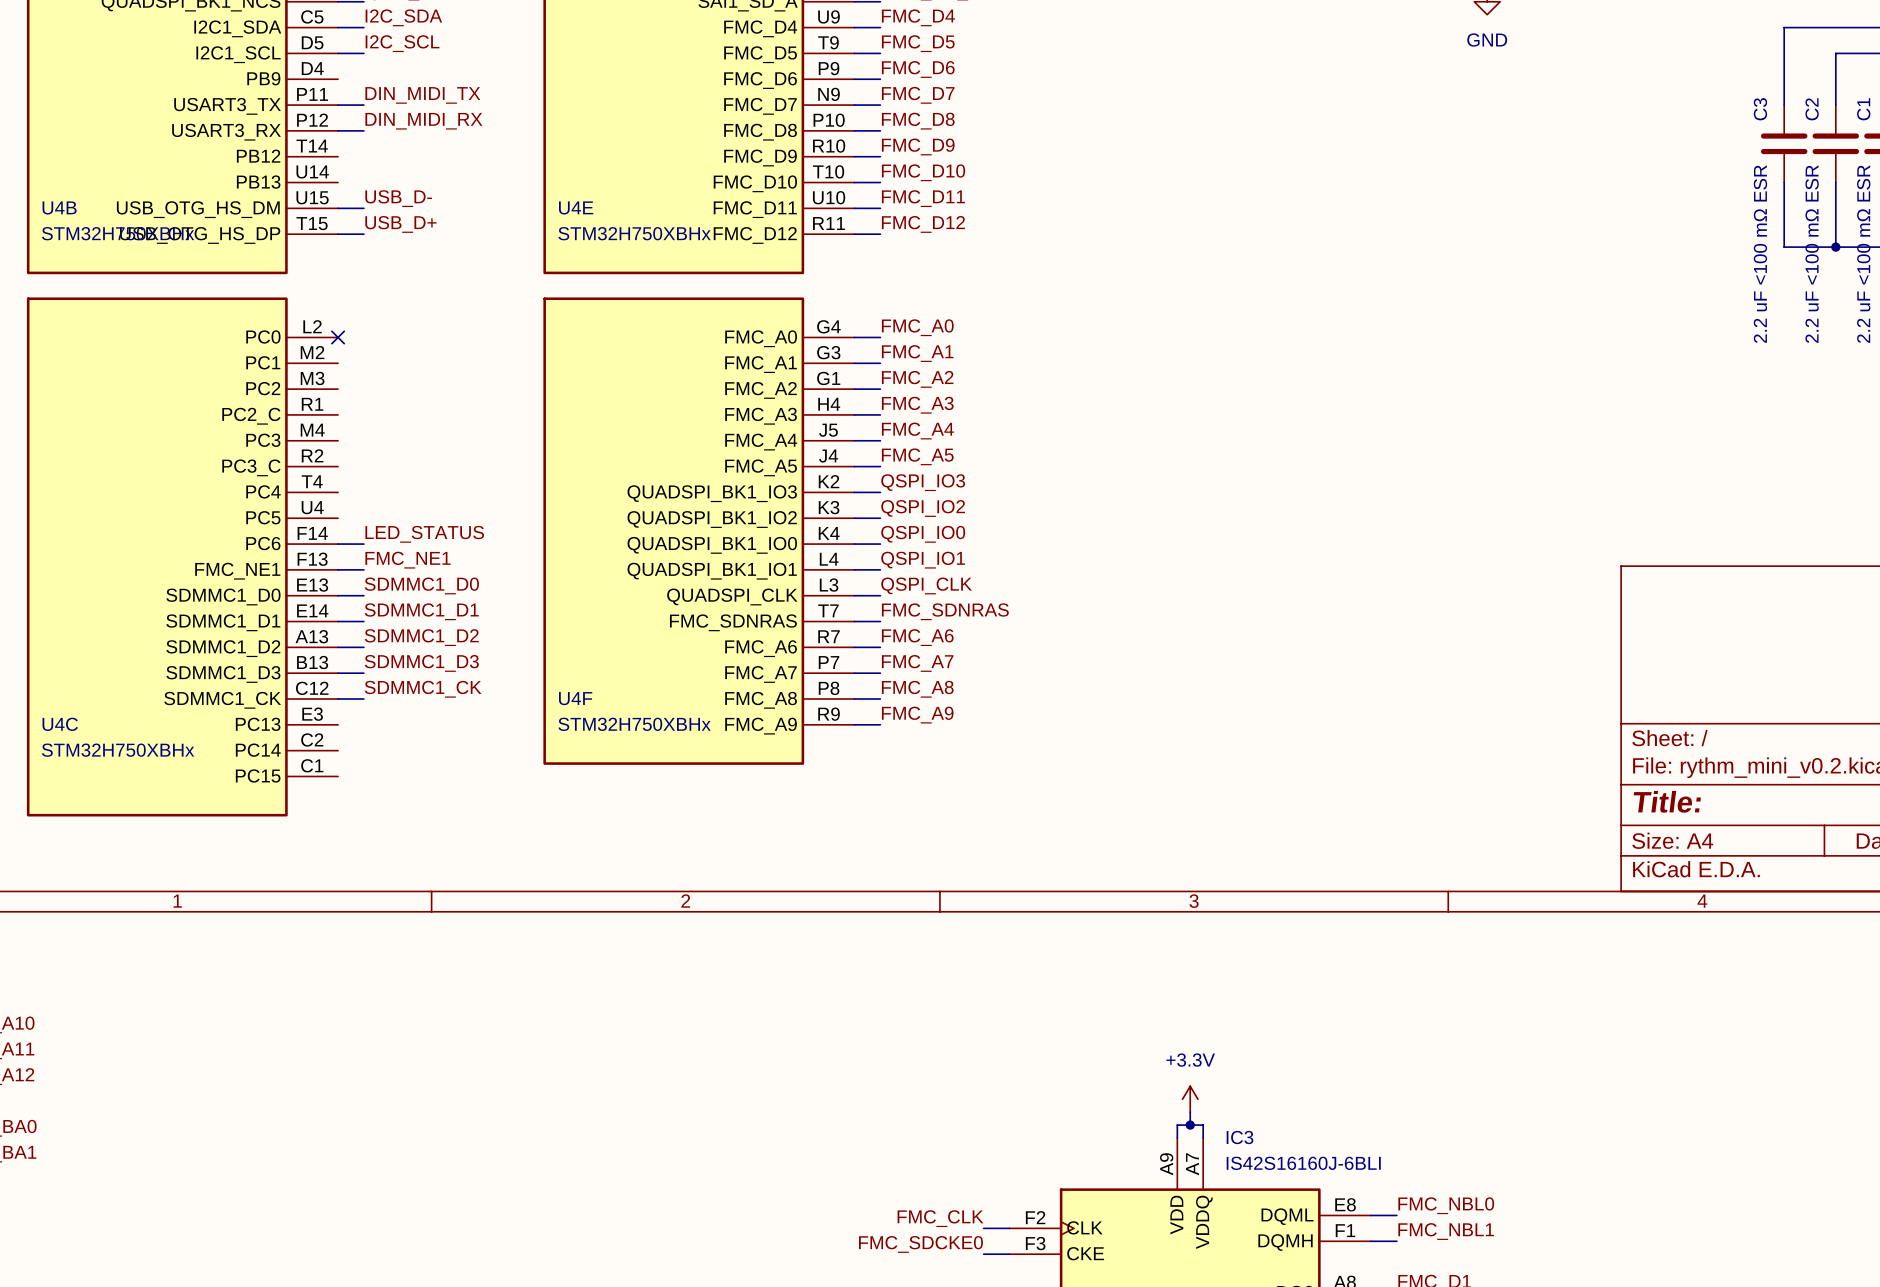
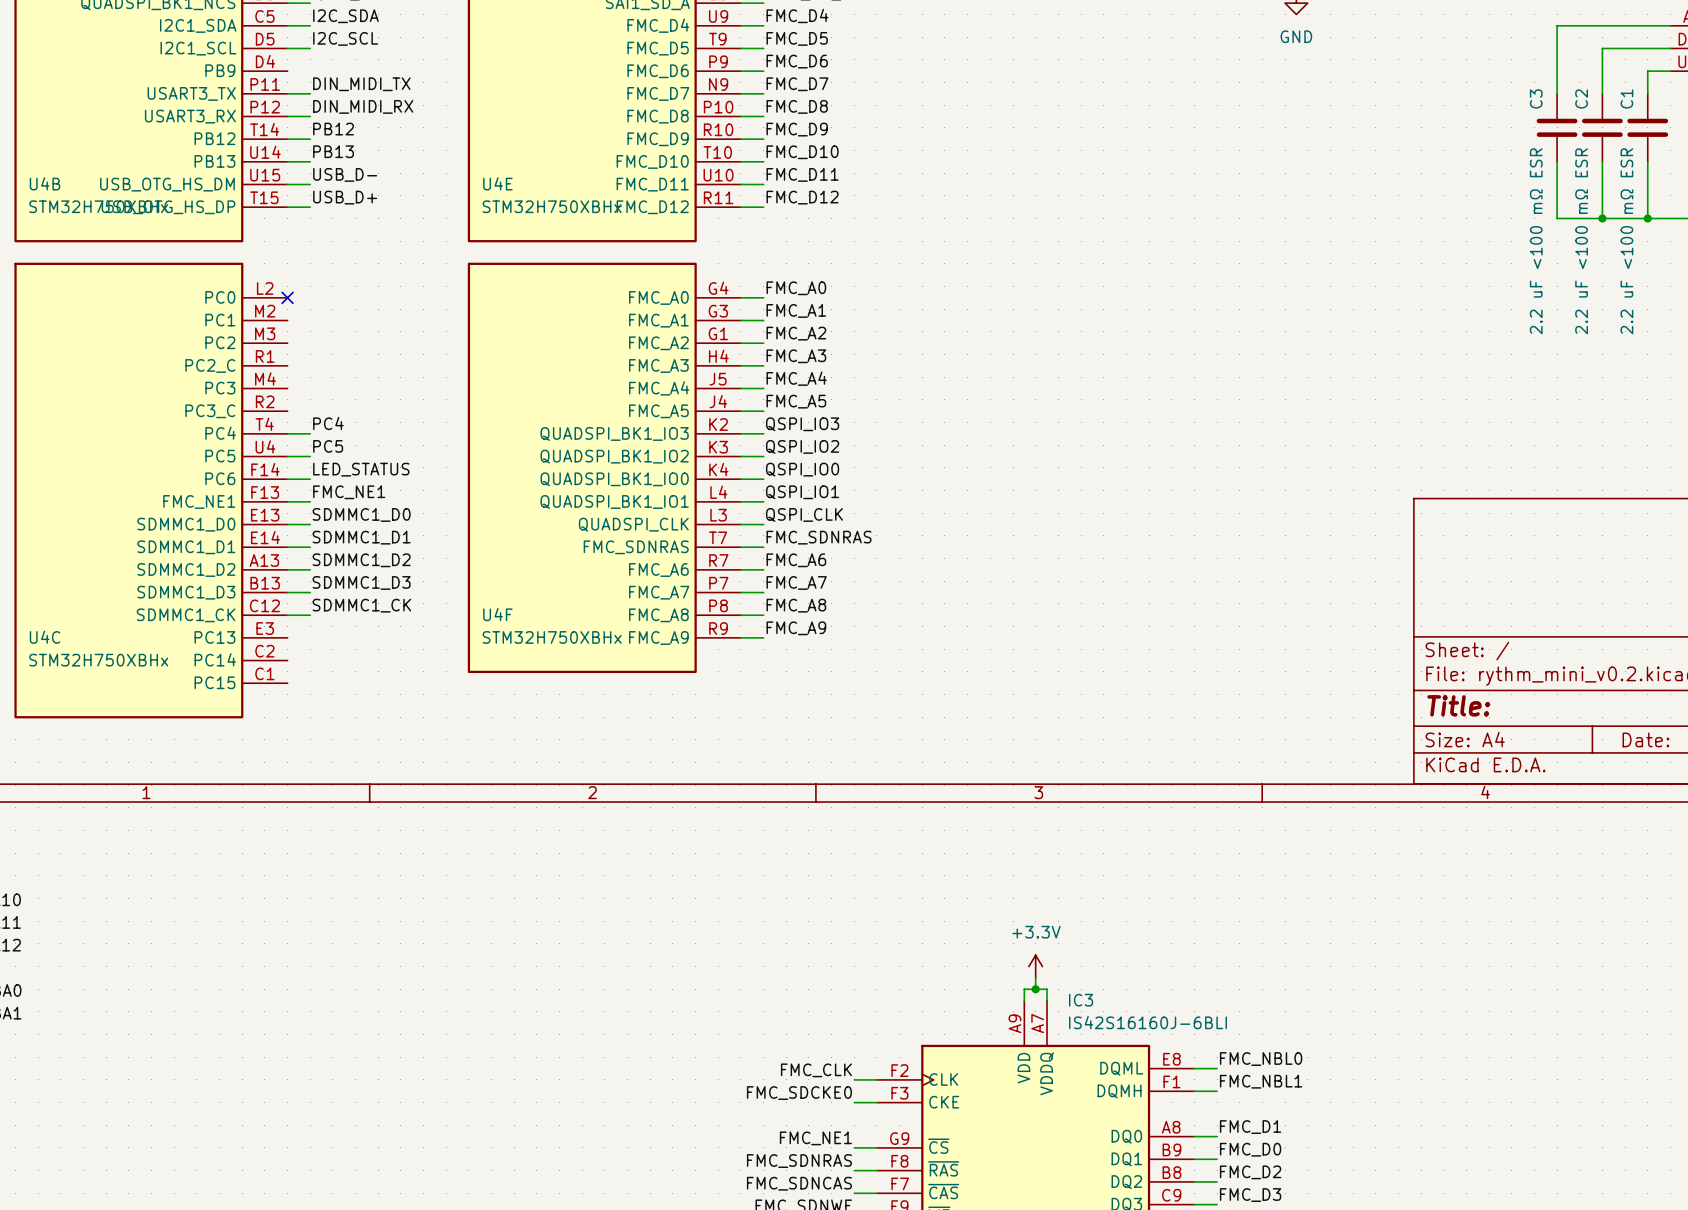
label: none -> PB12 (333, 129)
wire: none -> (287, 139) (310, 139)
label: none -> PB13 (333, 151)
wire: none -> (287, 161) (310, 161)
label: none -> PC4 (328, 423)
wire: none -> (287, 433) (310, 433)
label: none -> PC5 (328, 446)
wire: none -> (287, 456) (310, 456)

